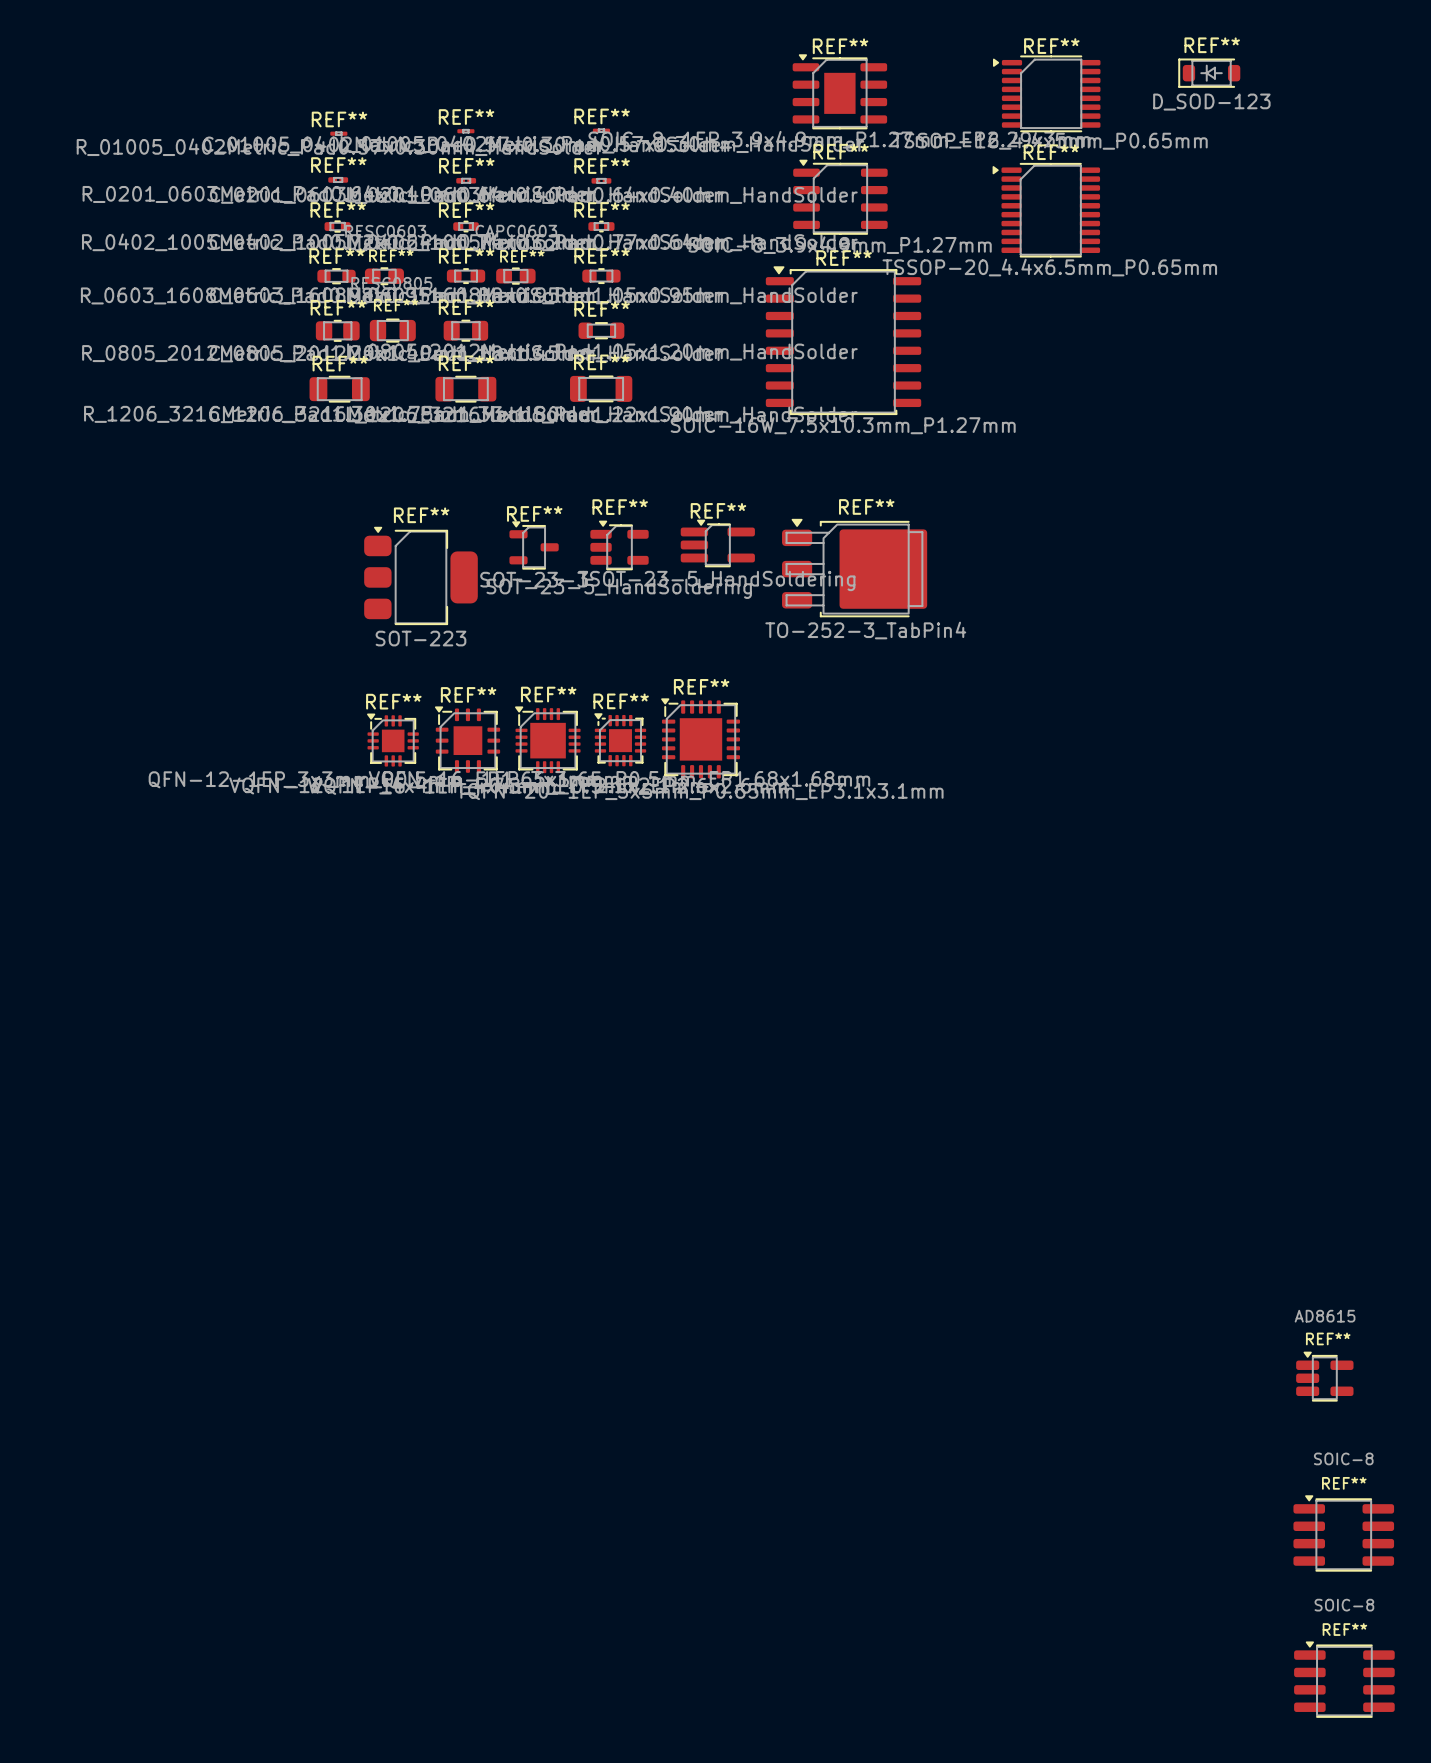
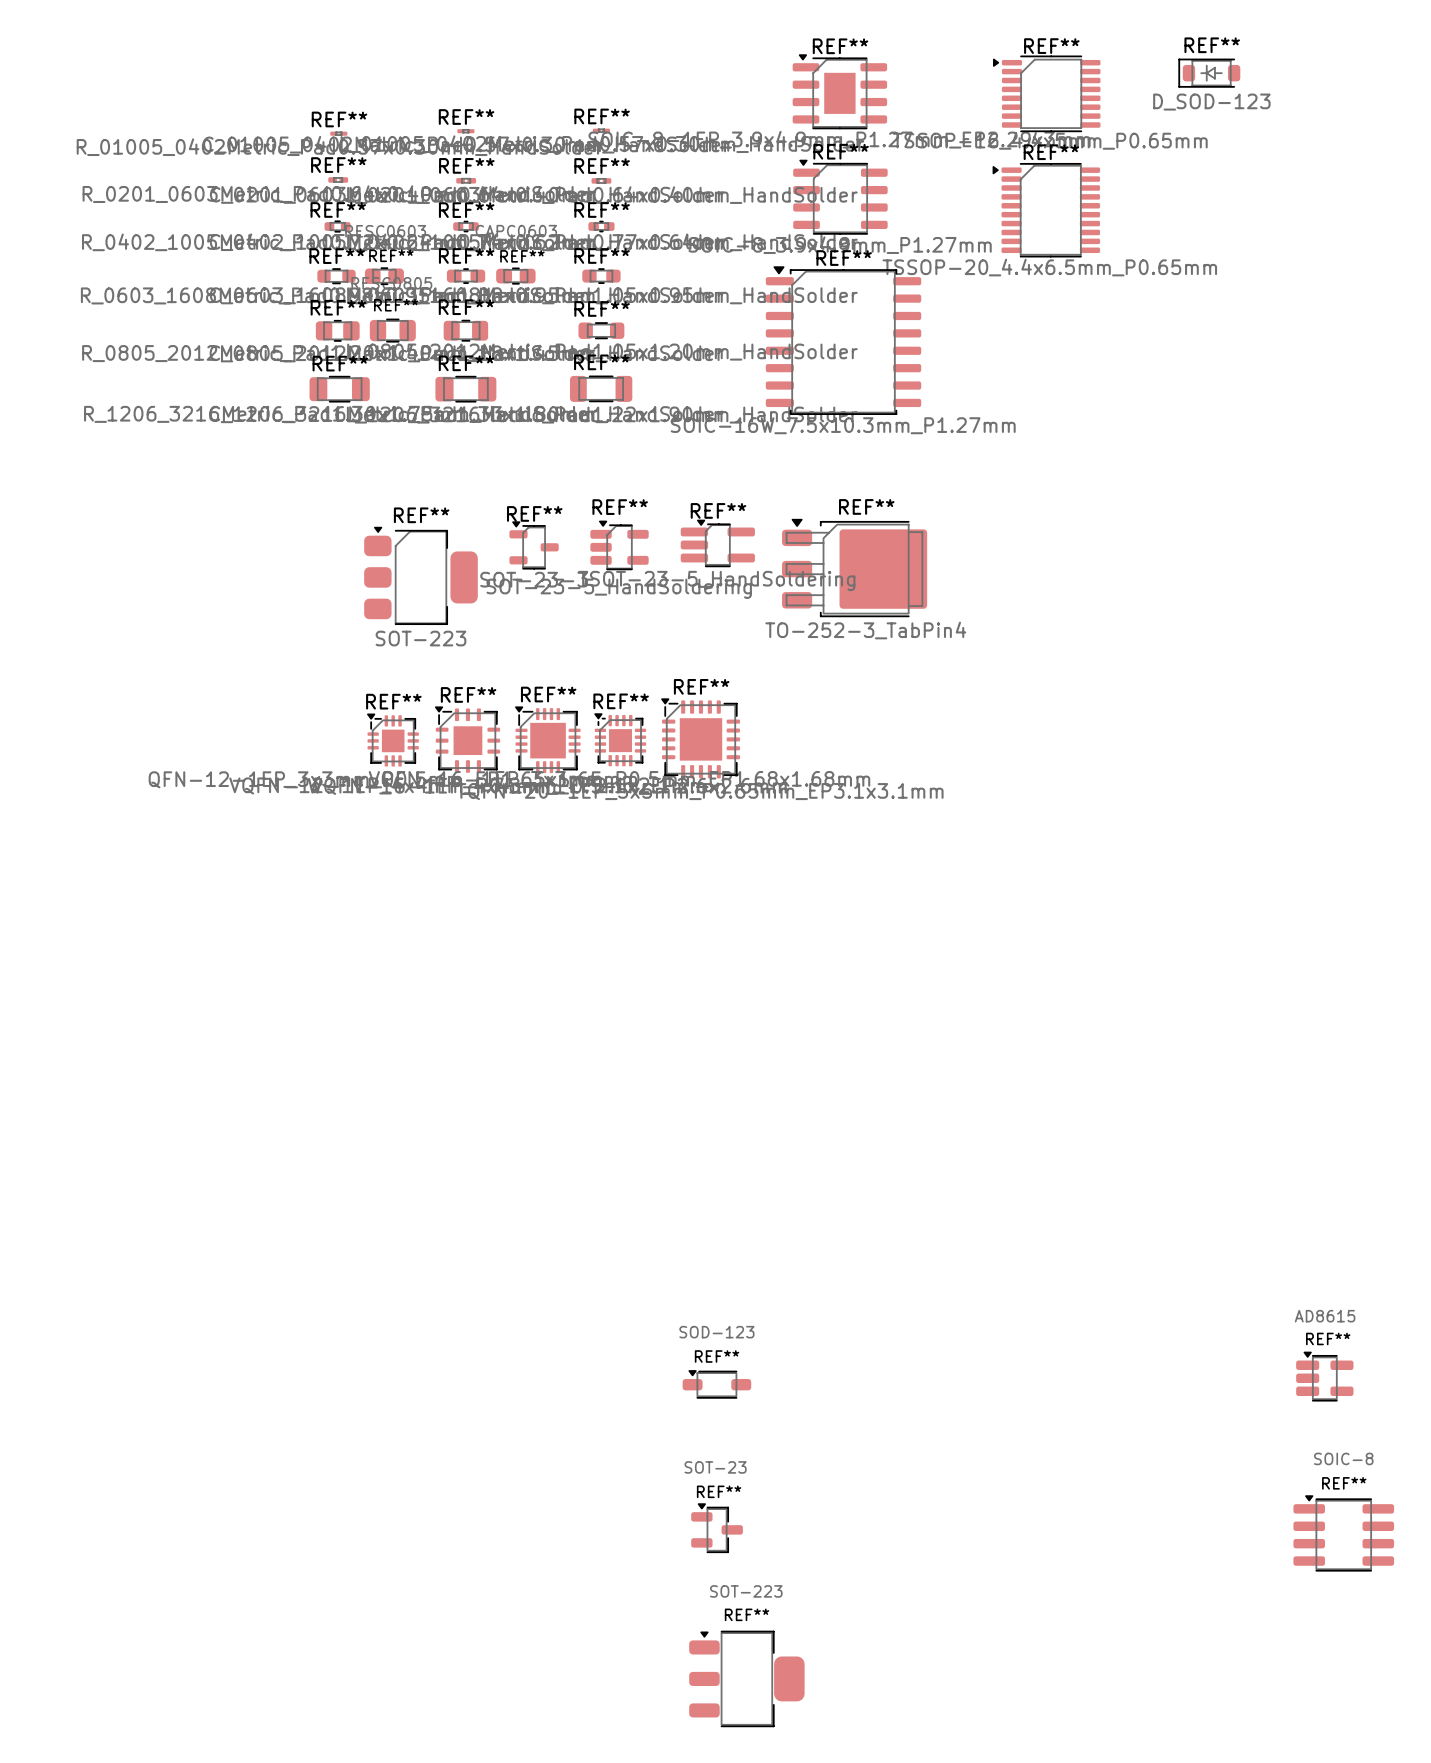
REF**: none -> SOD-123 (716, 1384)
REF**: none -> SOT-23 (717, 1528)
REF**: none -> SOT-223 (746, 1678)
REF**: SOIC-8 (1344, 1679) -> none

